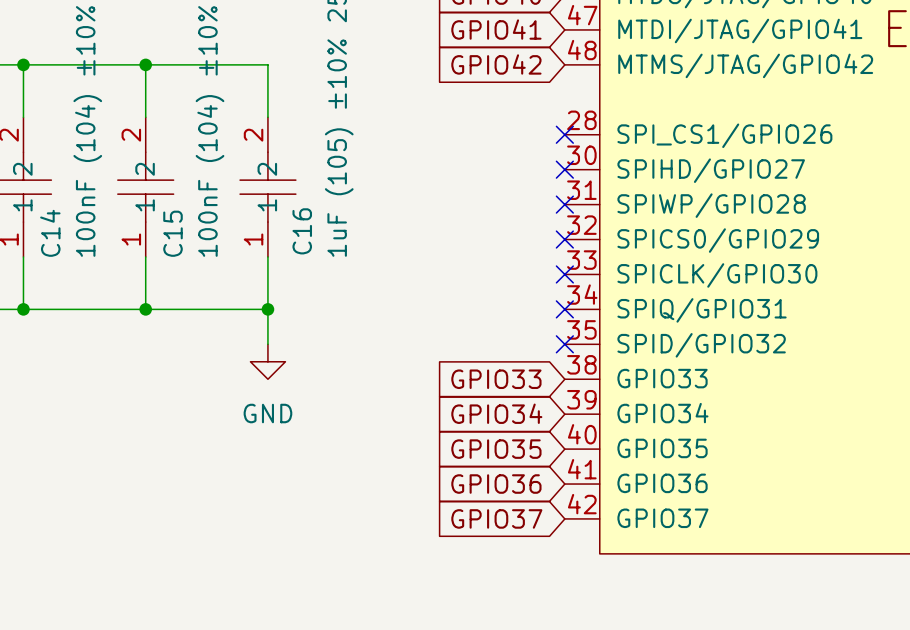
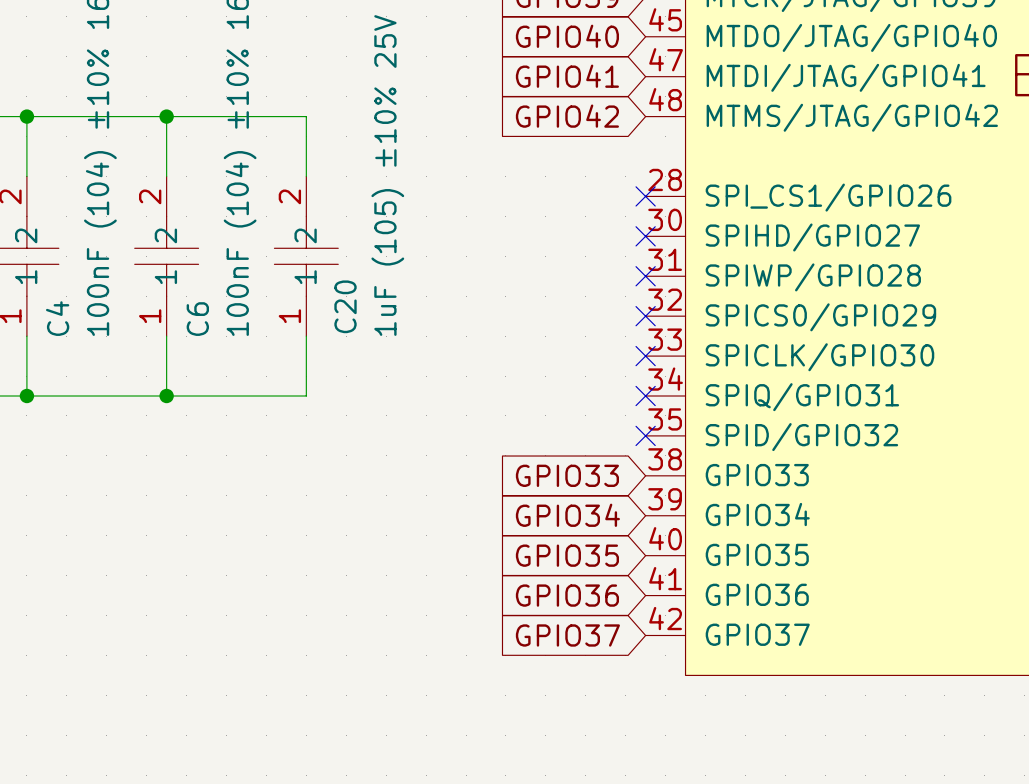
C16 name: C16 (302, 231) -> C20 (345, 306)
C14 name: C14 (50, 233) -> C4 (57, 318)
C15 name: C15 (173, 233) -> C6 (197, 319)
wire: (267, 309) (267, 344) -> none
junction: (267, 309) -> none
power symbol: GND (267, 361) -> none

